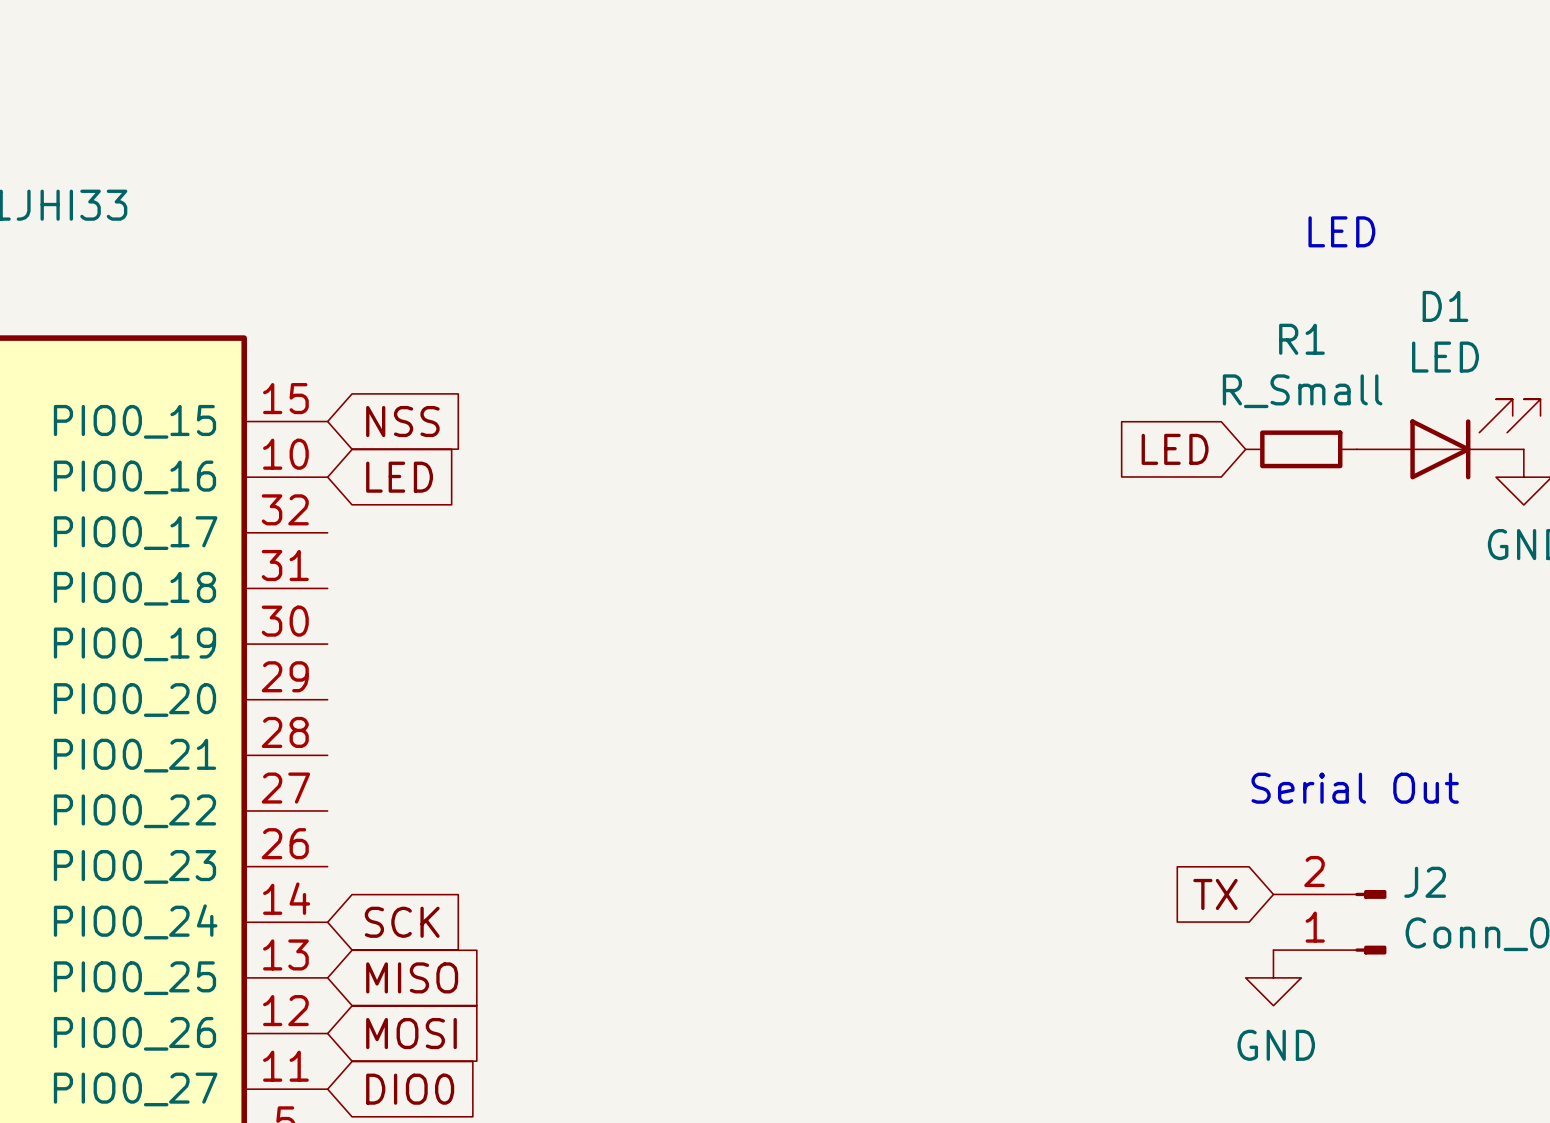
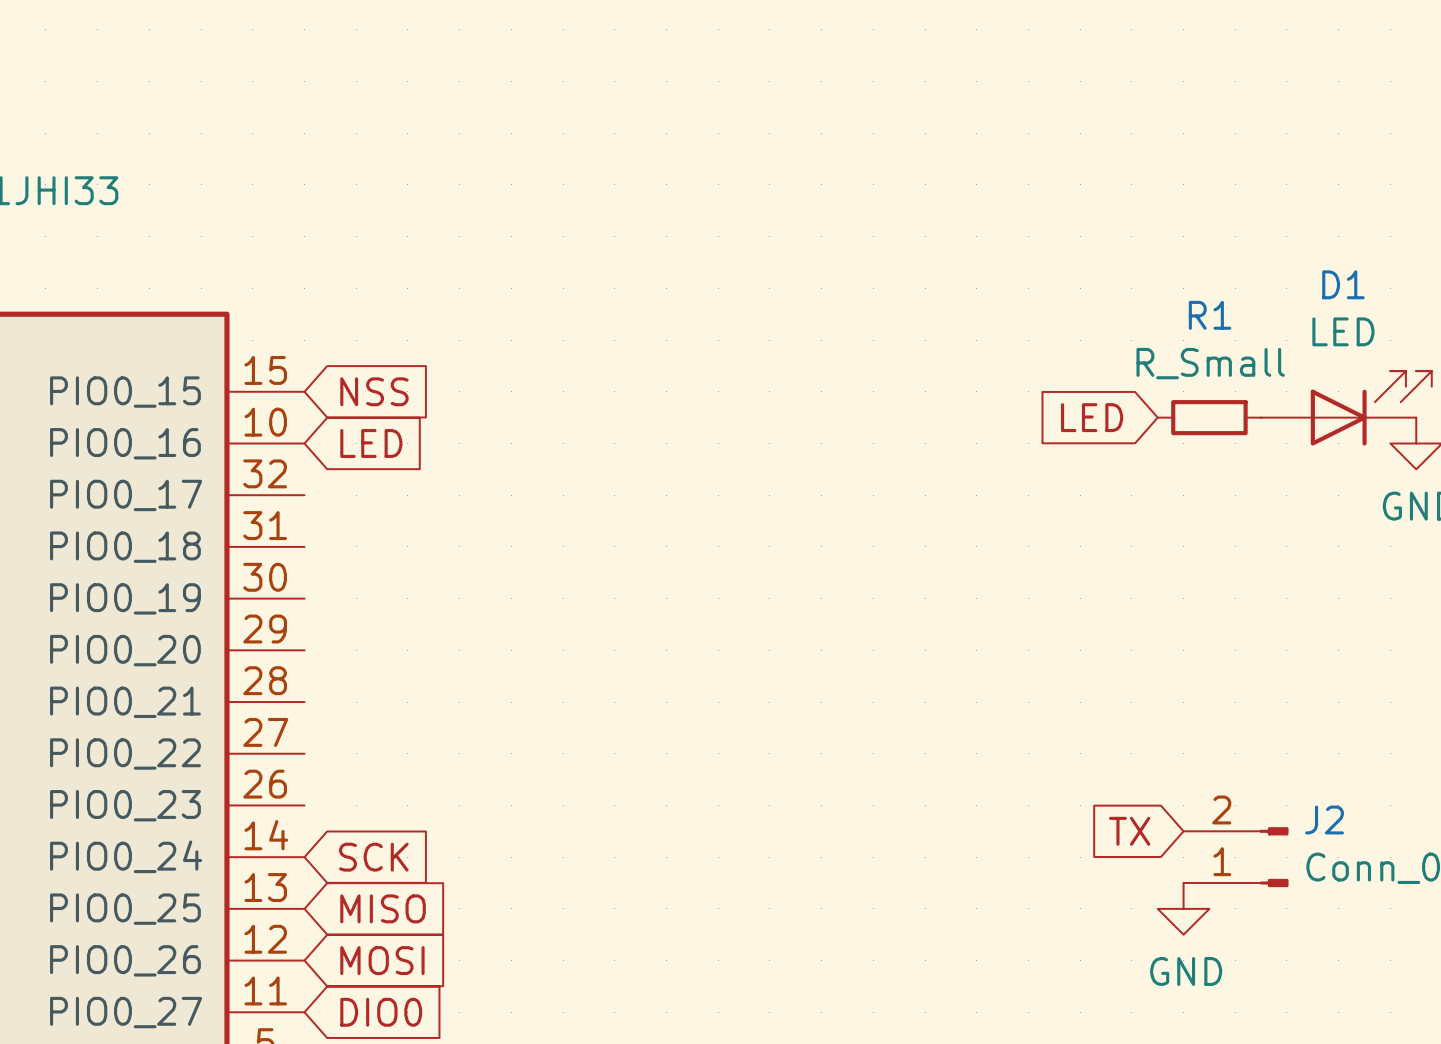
text: LED (1341, 231) -> none
text: Serial Out (1355, 788) -> none

